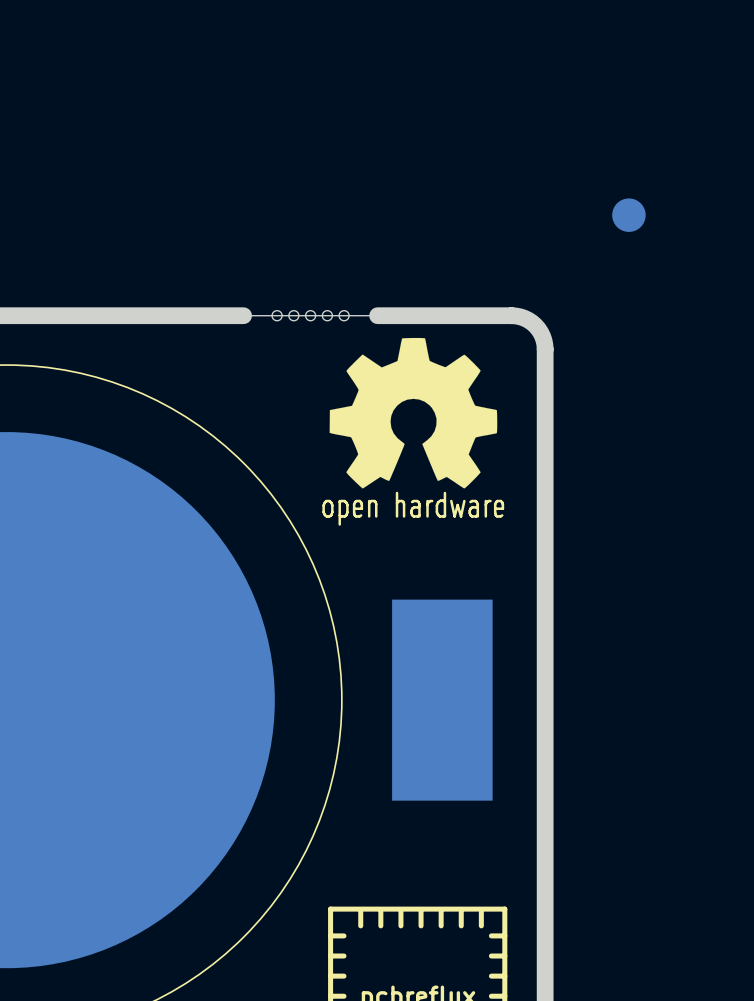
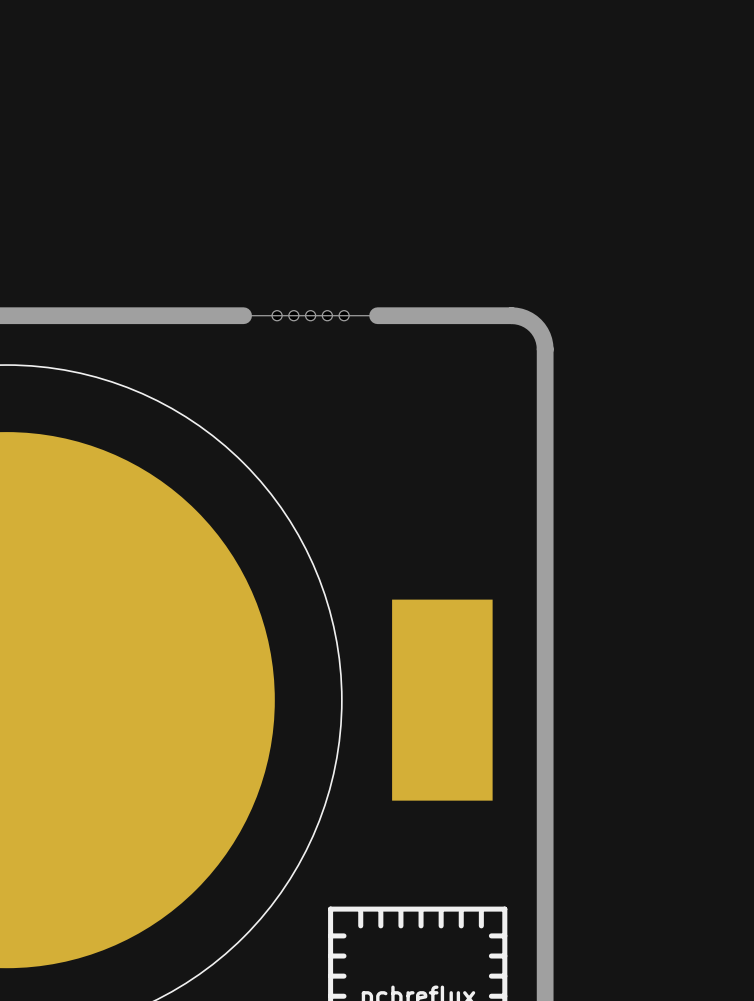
part: (628, 215) -> none
drawing: [322, 337, 505, 526] -> none

